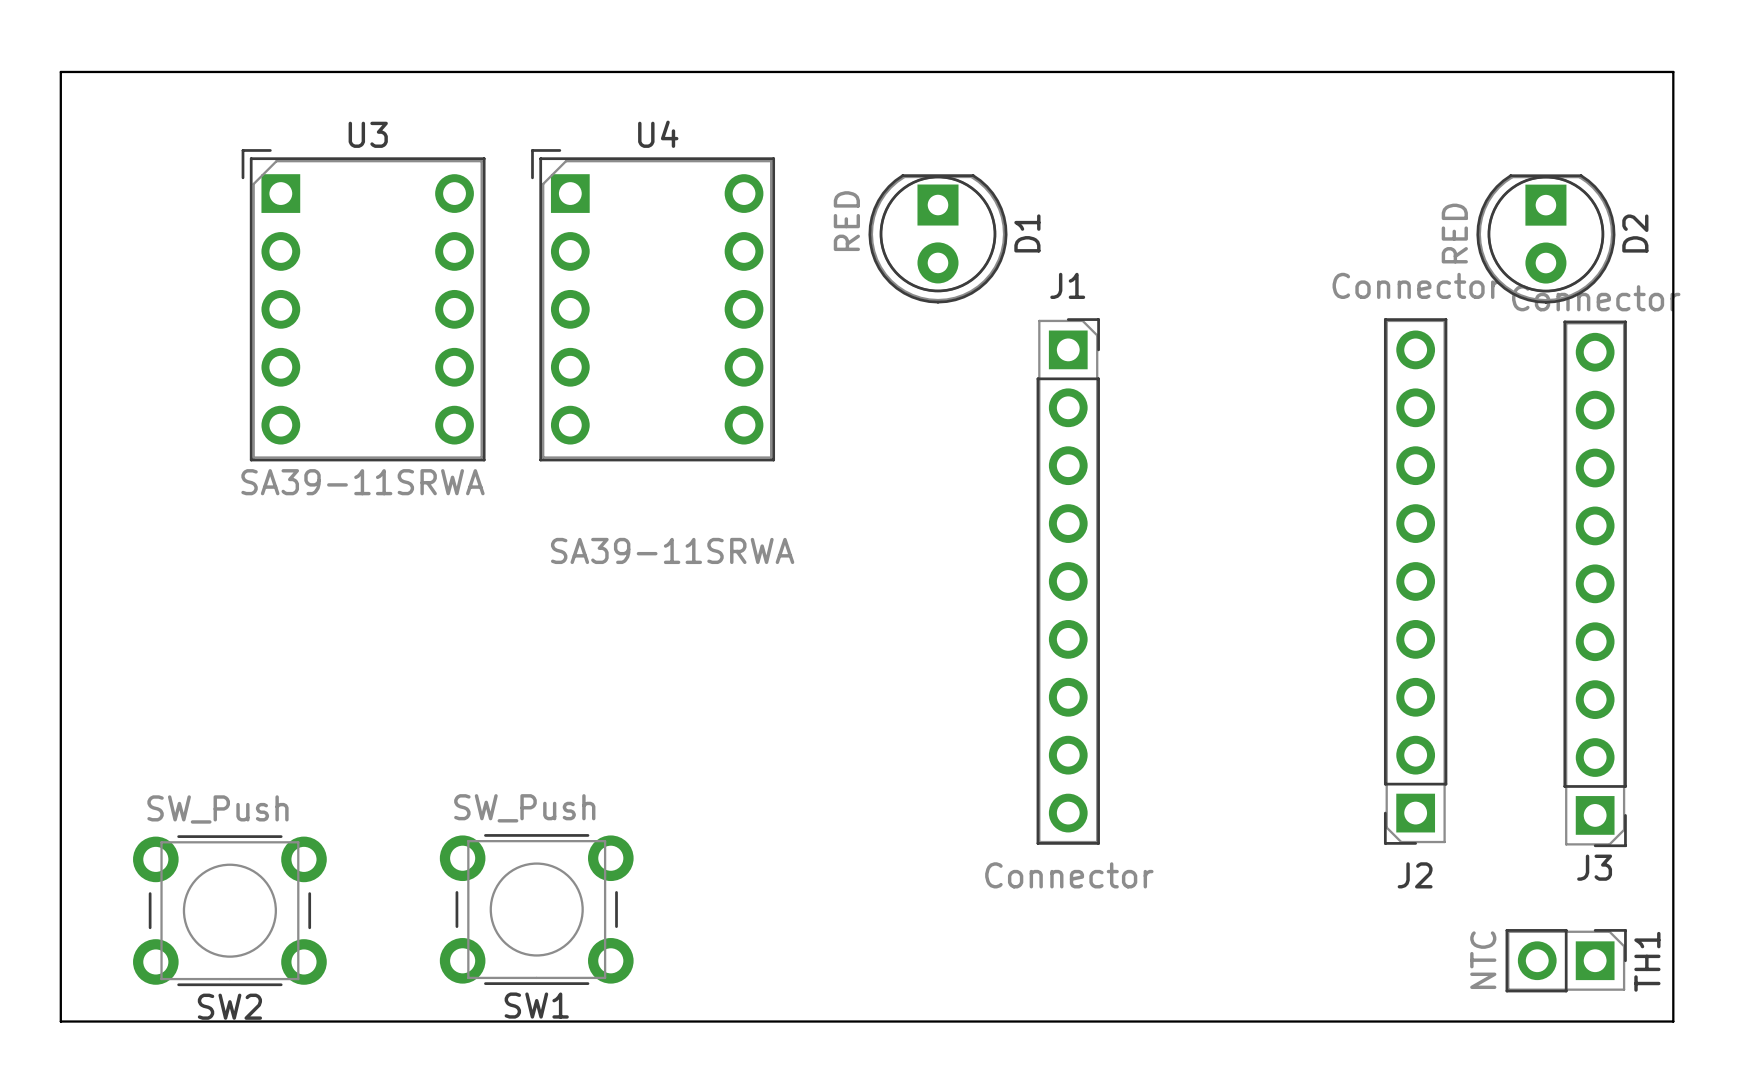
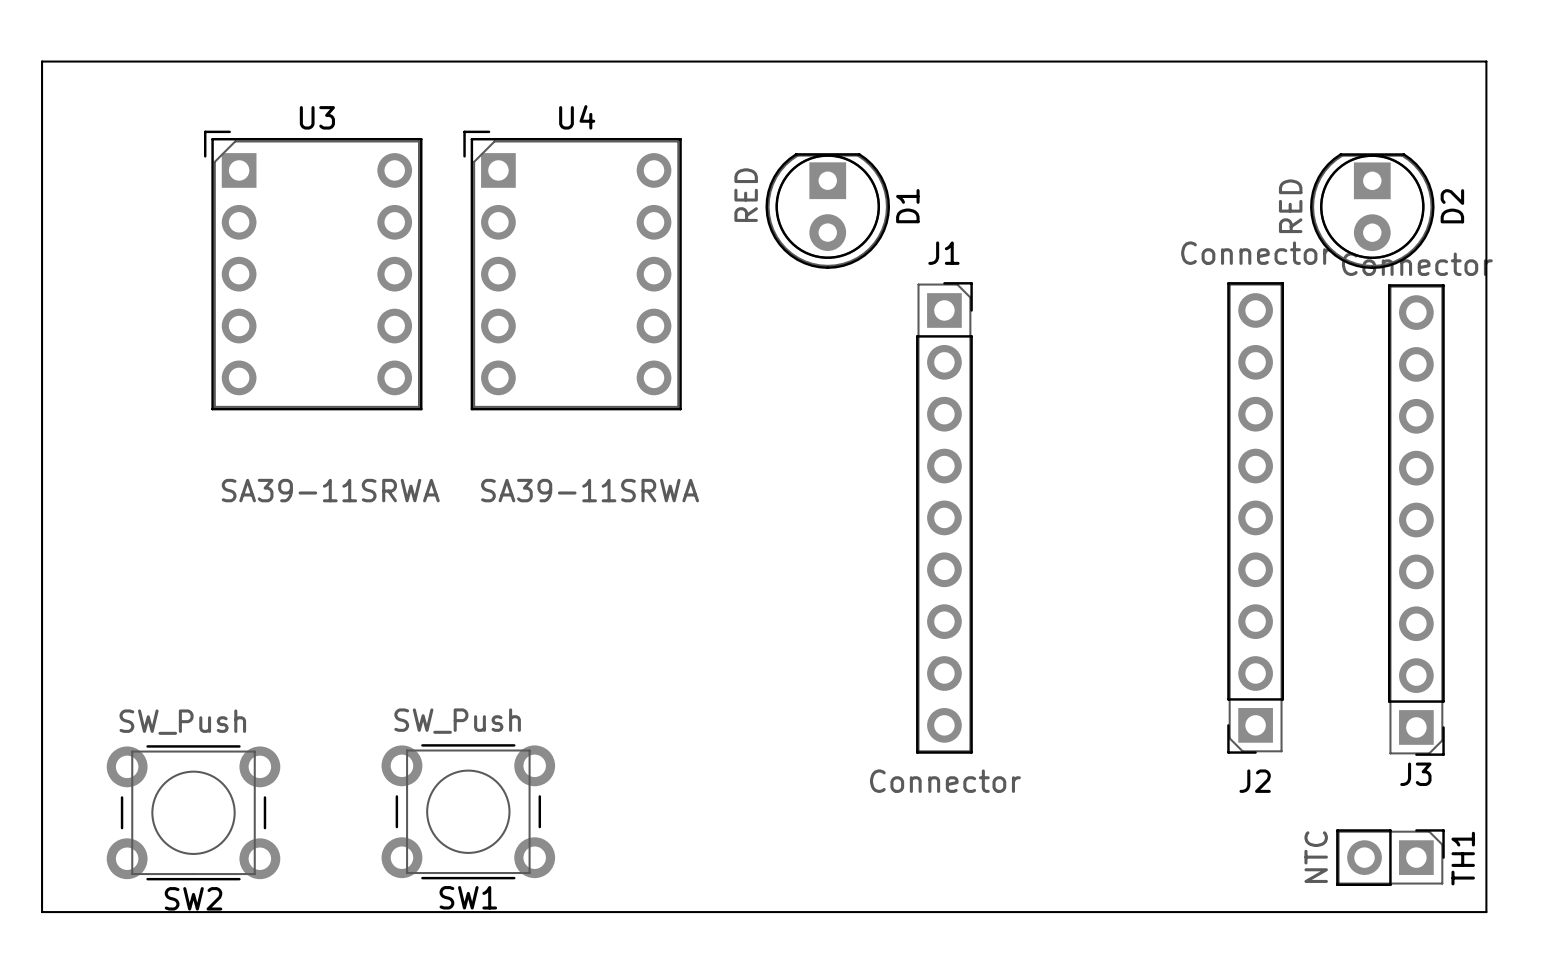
U3 value position: SA39-11SRWA (362, 482) -> SA39-11SRWA (330, 490)

